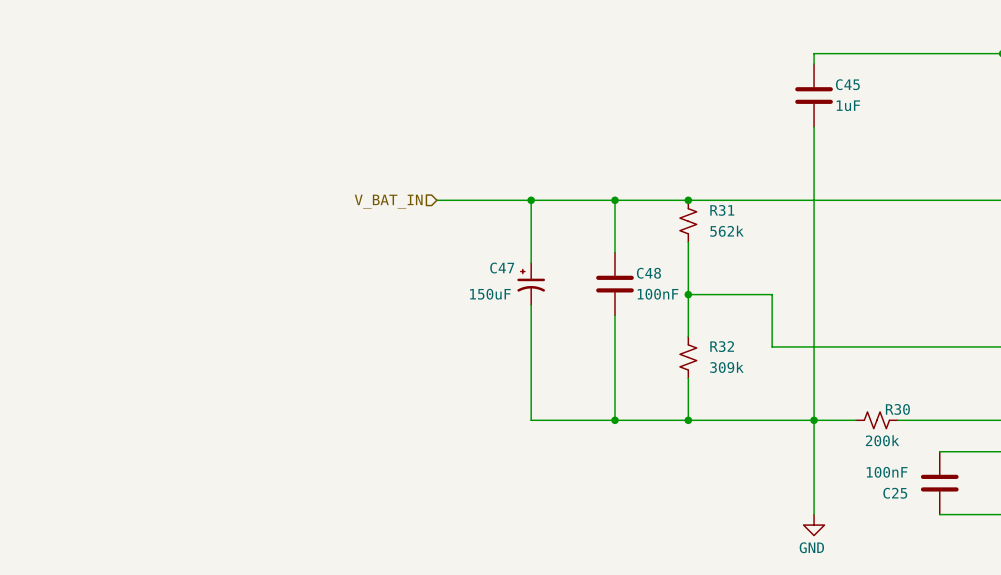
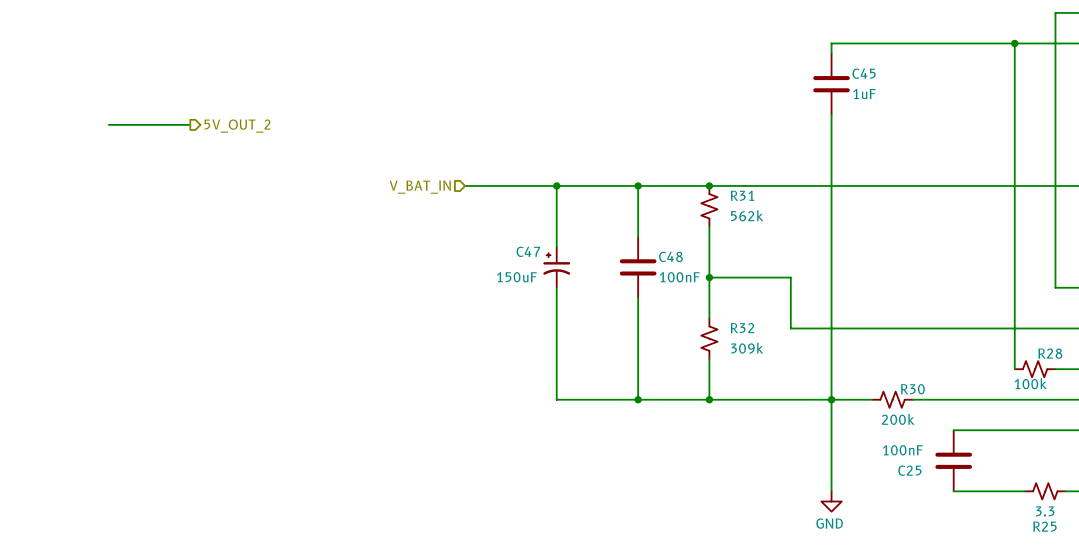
wire: none -> (108, 124) (190, 124)
hierarchical label: none -> 5V_OUT_2 (237, 126)

